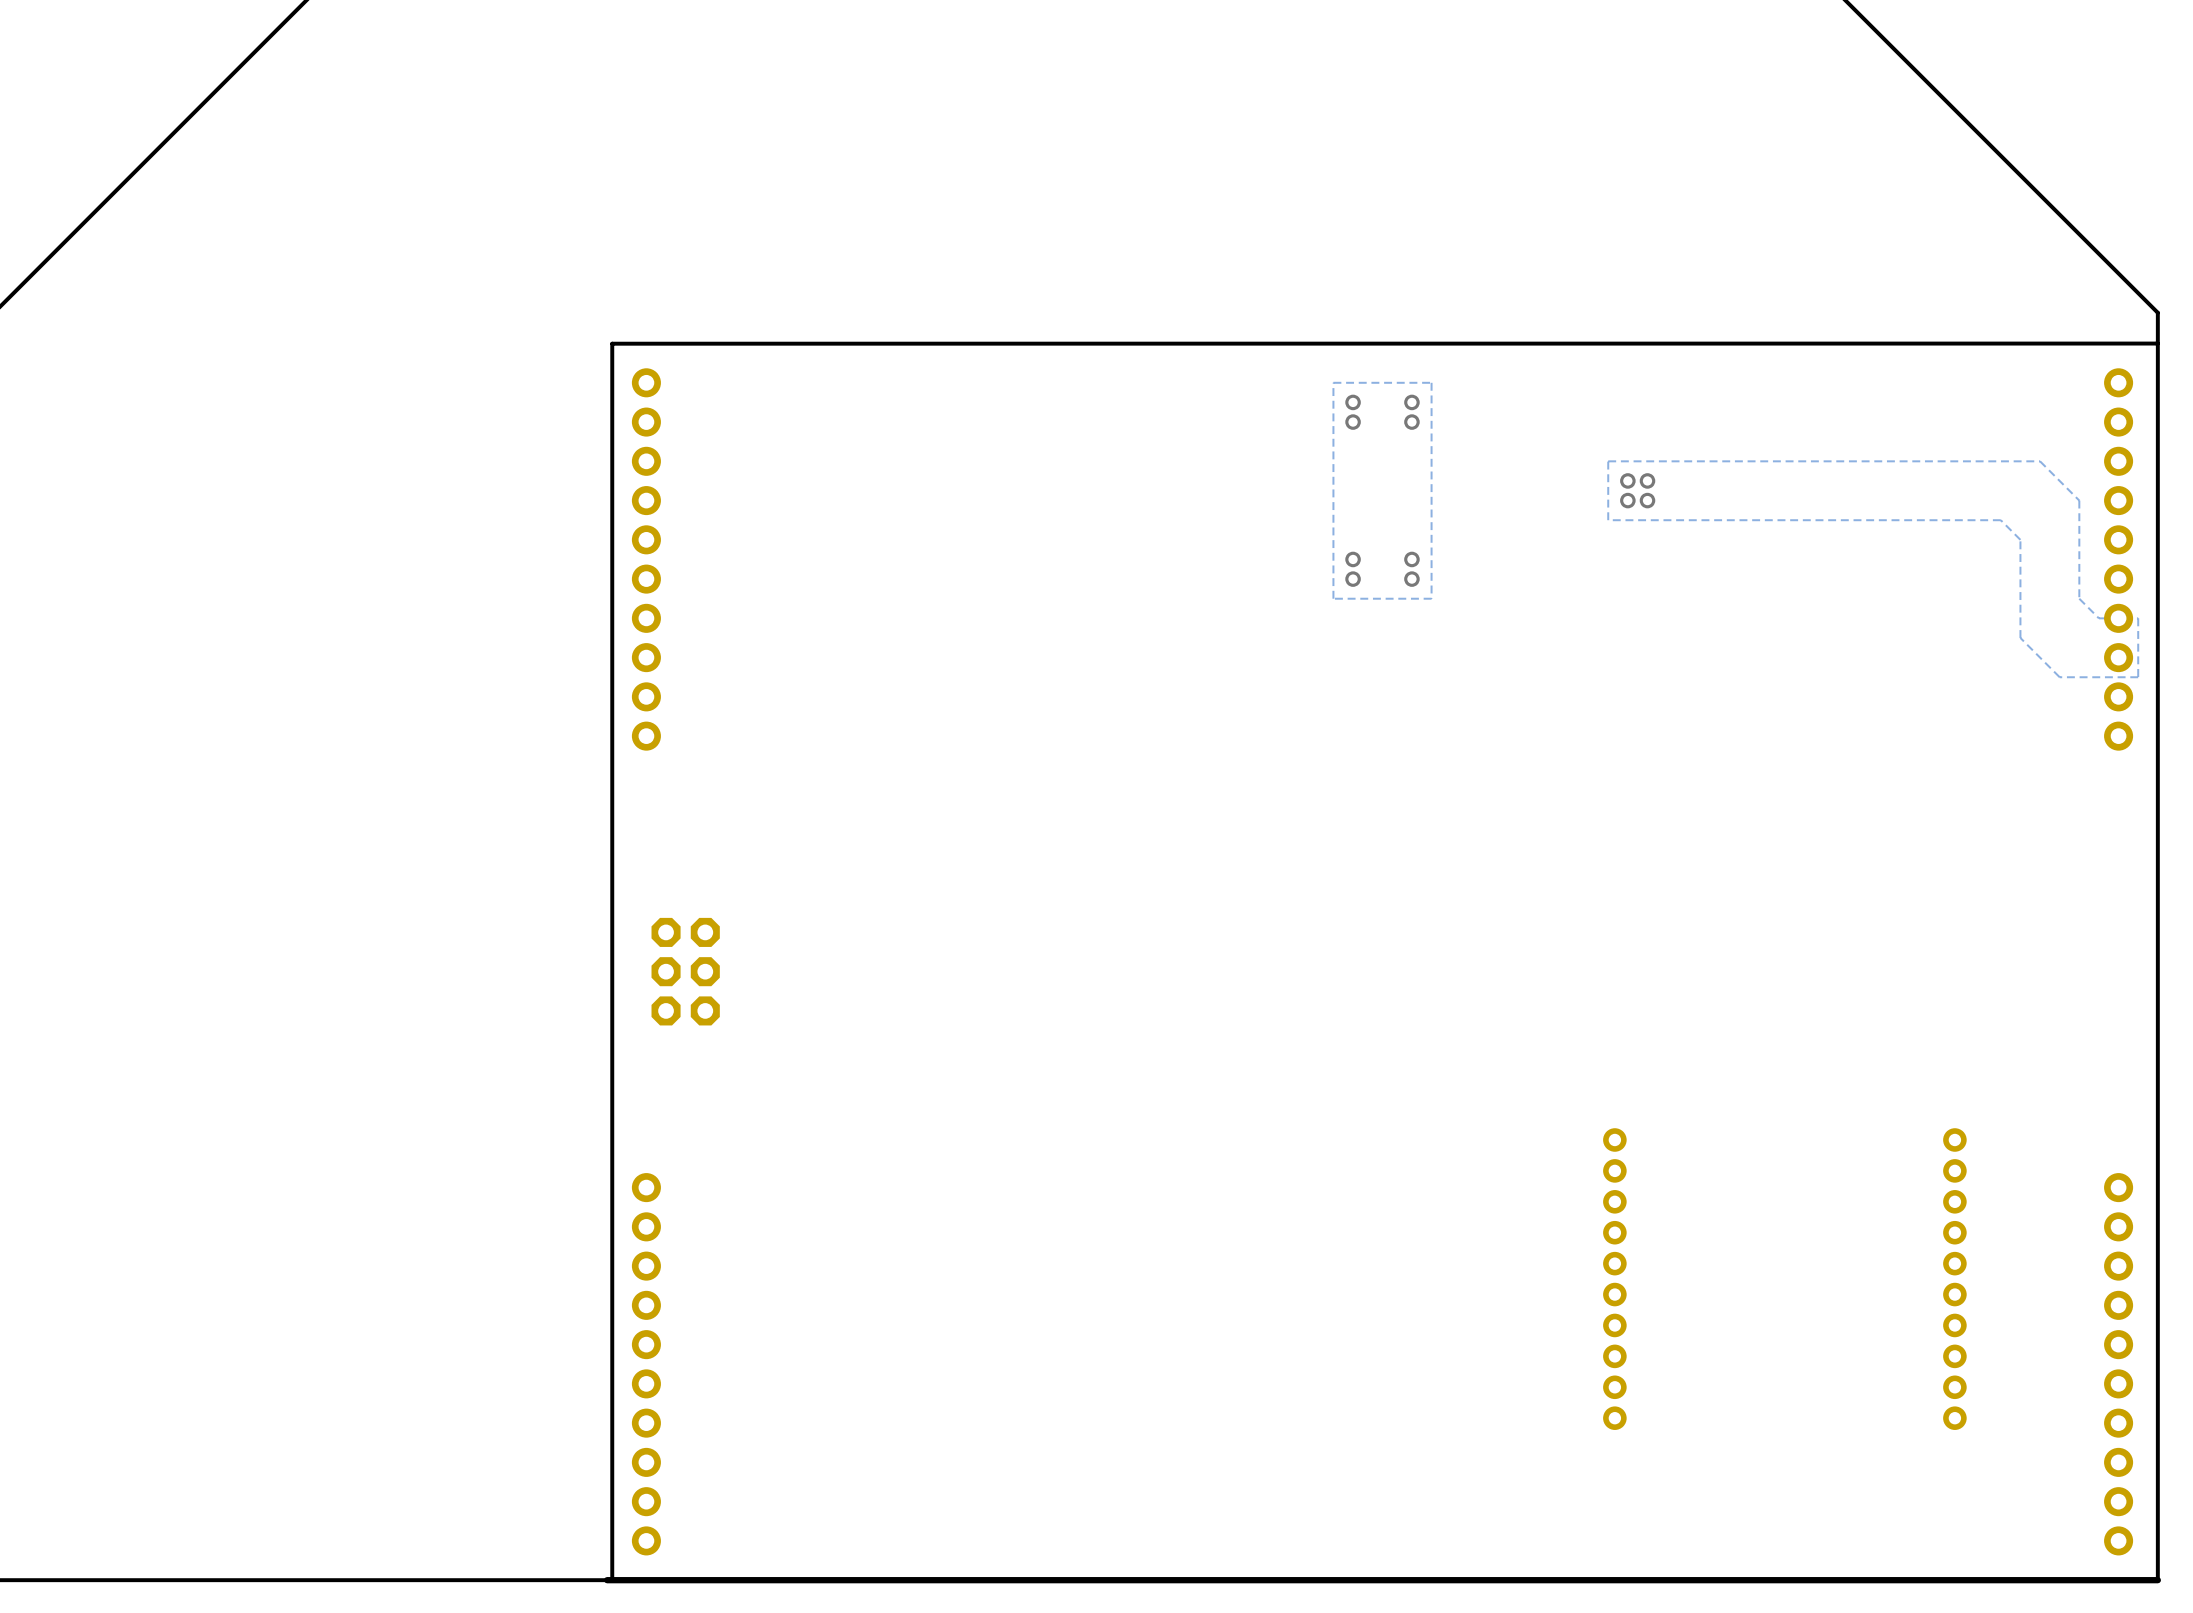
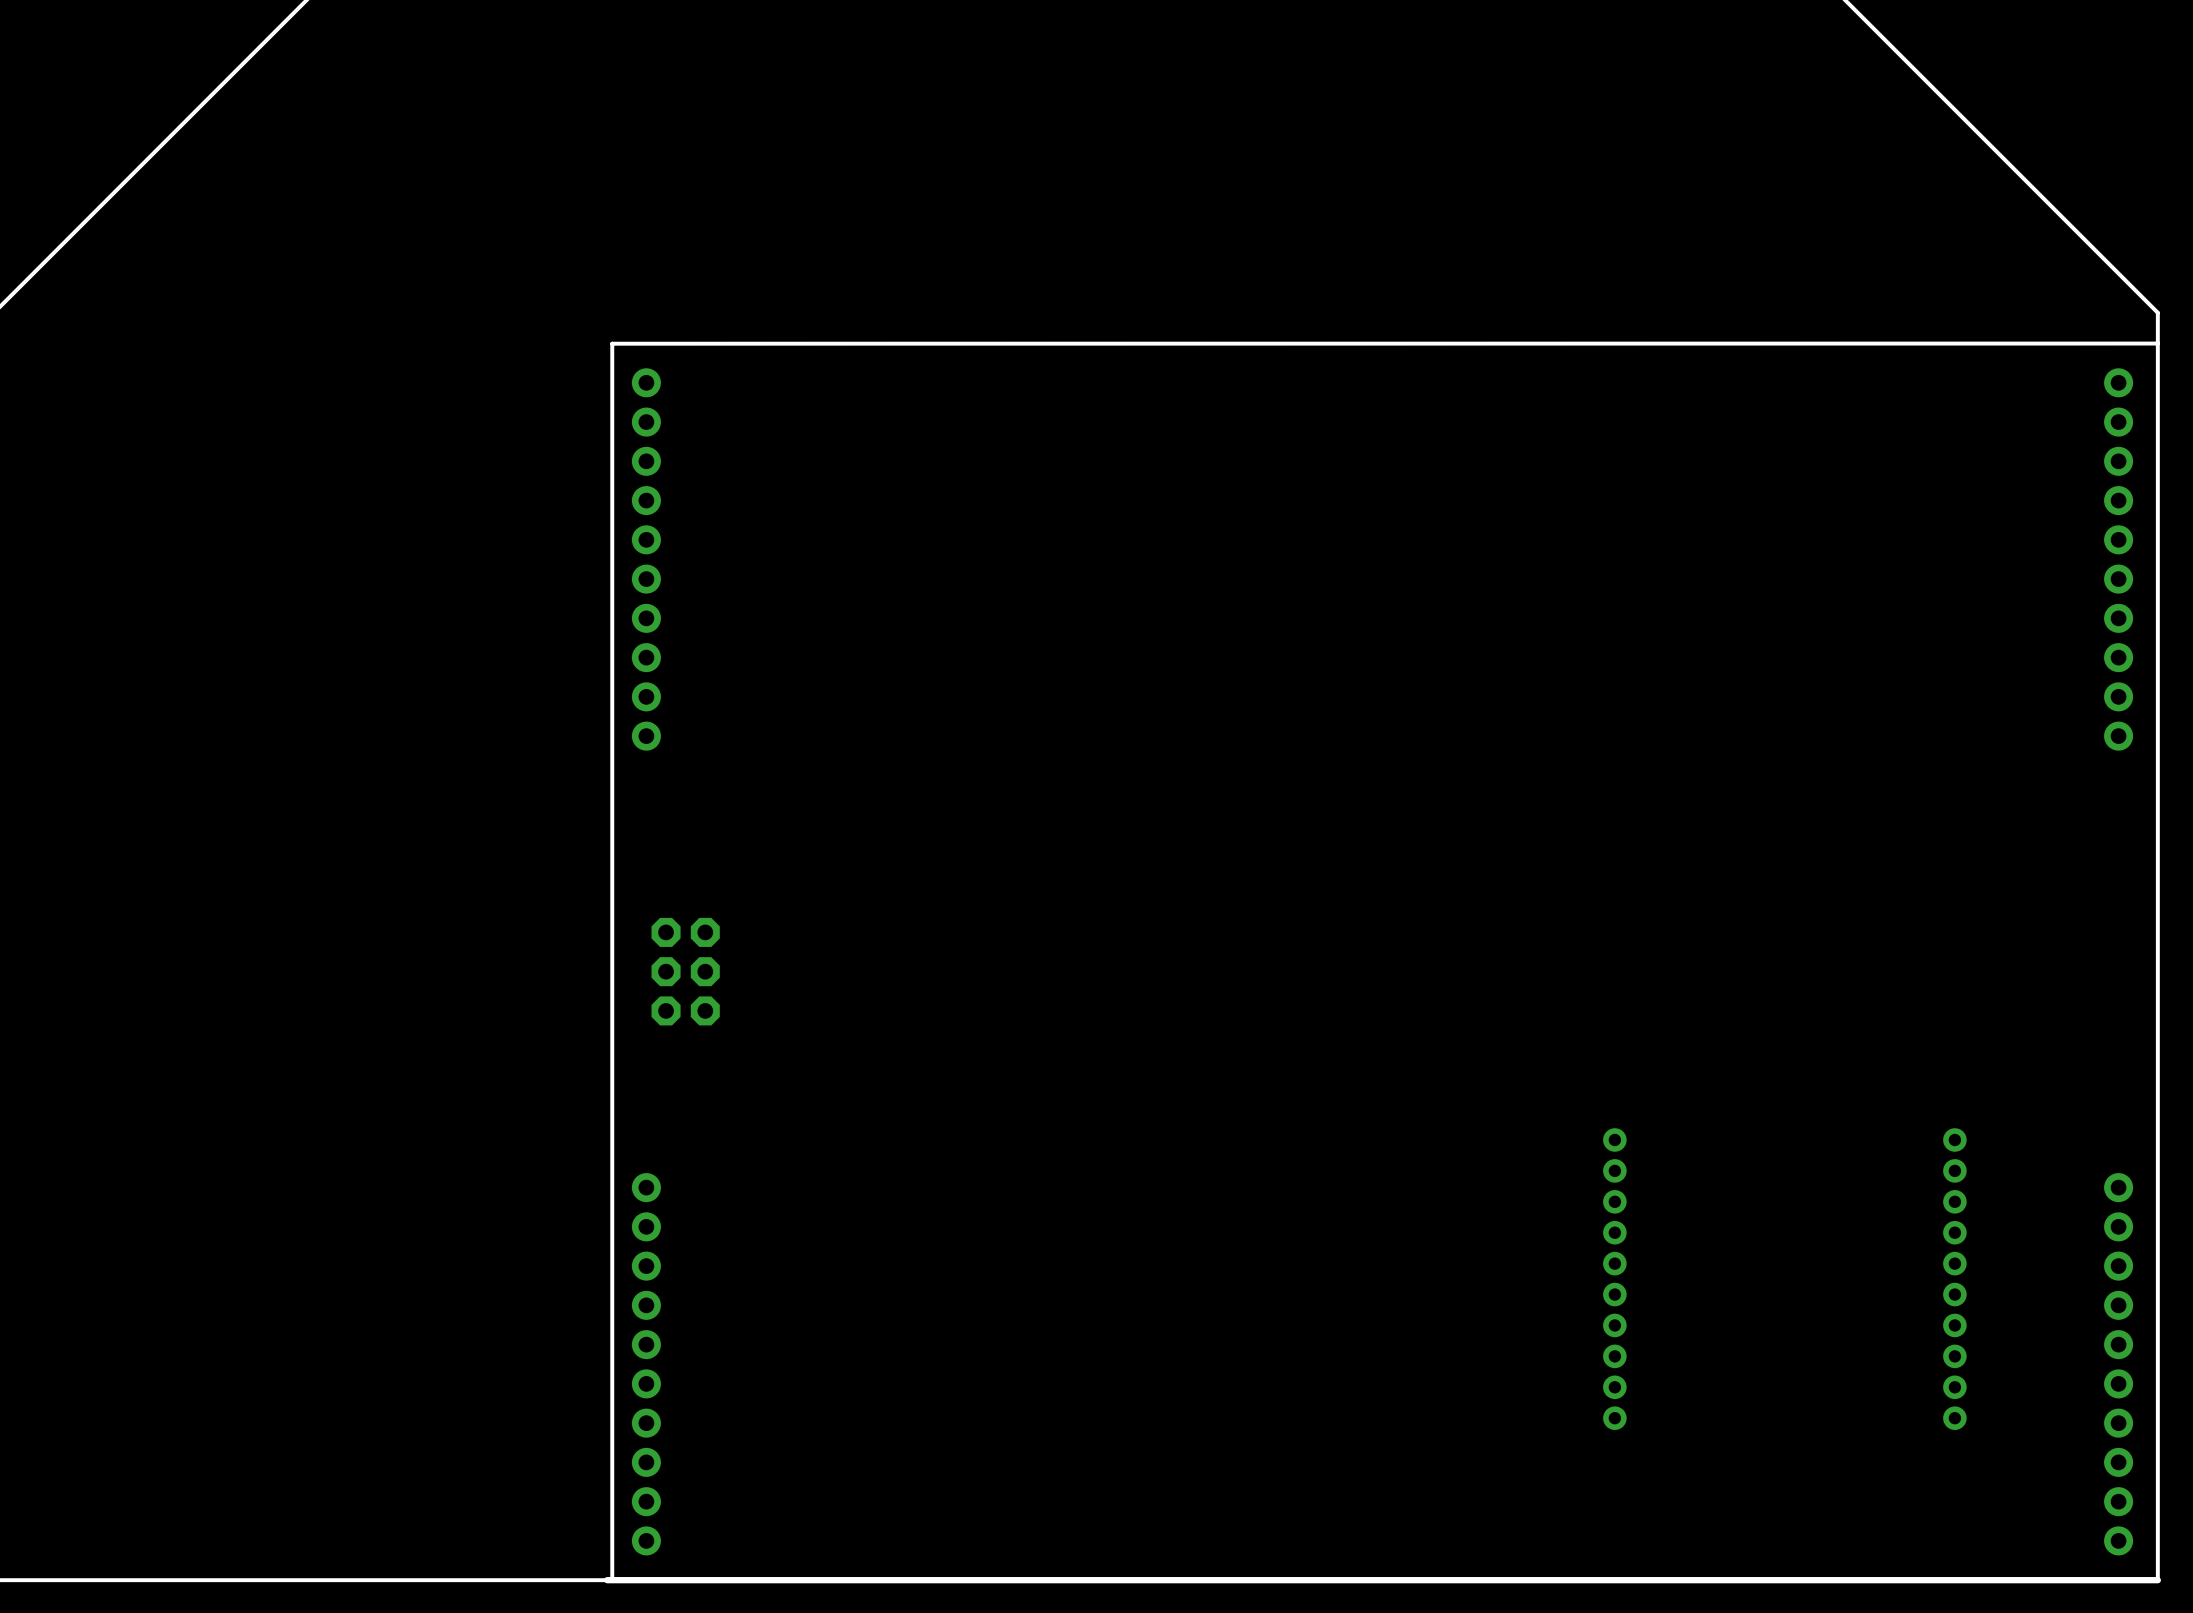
zone outline: (1431, 382) (1431, 598) (1333, 598) (1333, 382) (1431, 382) -> none
via: (1353, 402) -> none
via: (1411, 402) -> none
via: (1353, 422) -> none
via: (1411, 422) -> none
zone outline: (2040, 461) (1608, 461) (1608, 520) (2000, 520) (2020, 539) (2020, 637) (2059, 677) (2138, 677) (2138, 618) (2098, 618) (2079, 598) (2079, 500) (2040, 461) -> none
via: (1627, 480) -> none
via: (1647, 480) -> none
via: (1627, 500) -> none
via: (1647, 500) -> none
via: (1353, 559) -> none
via: (1411, 559) -> none
via: (1353, 579) -> none
via: (1411, 579) -> none

